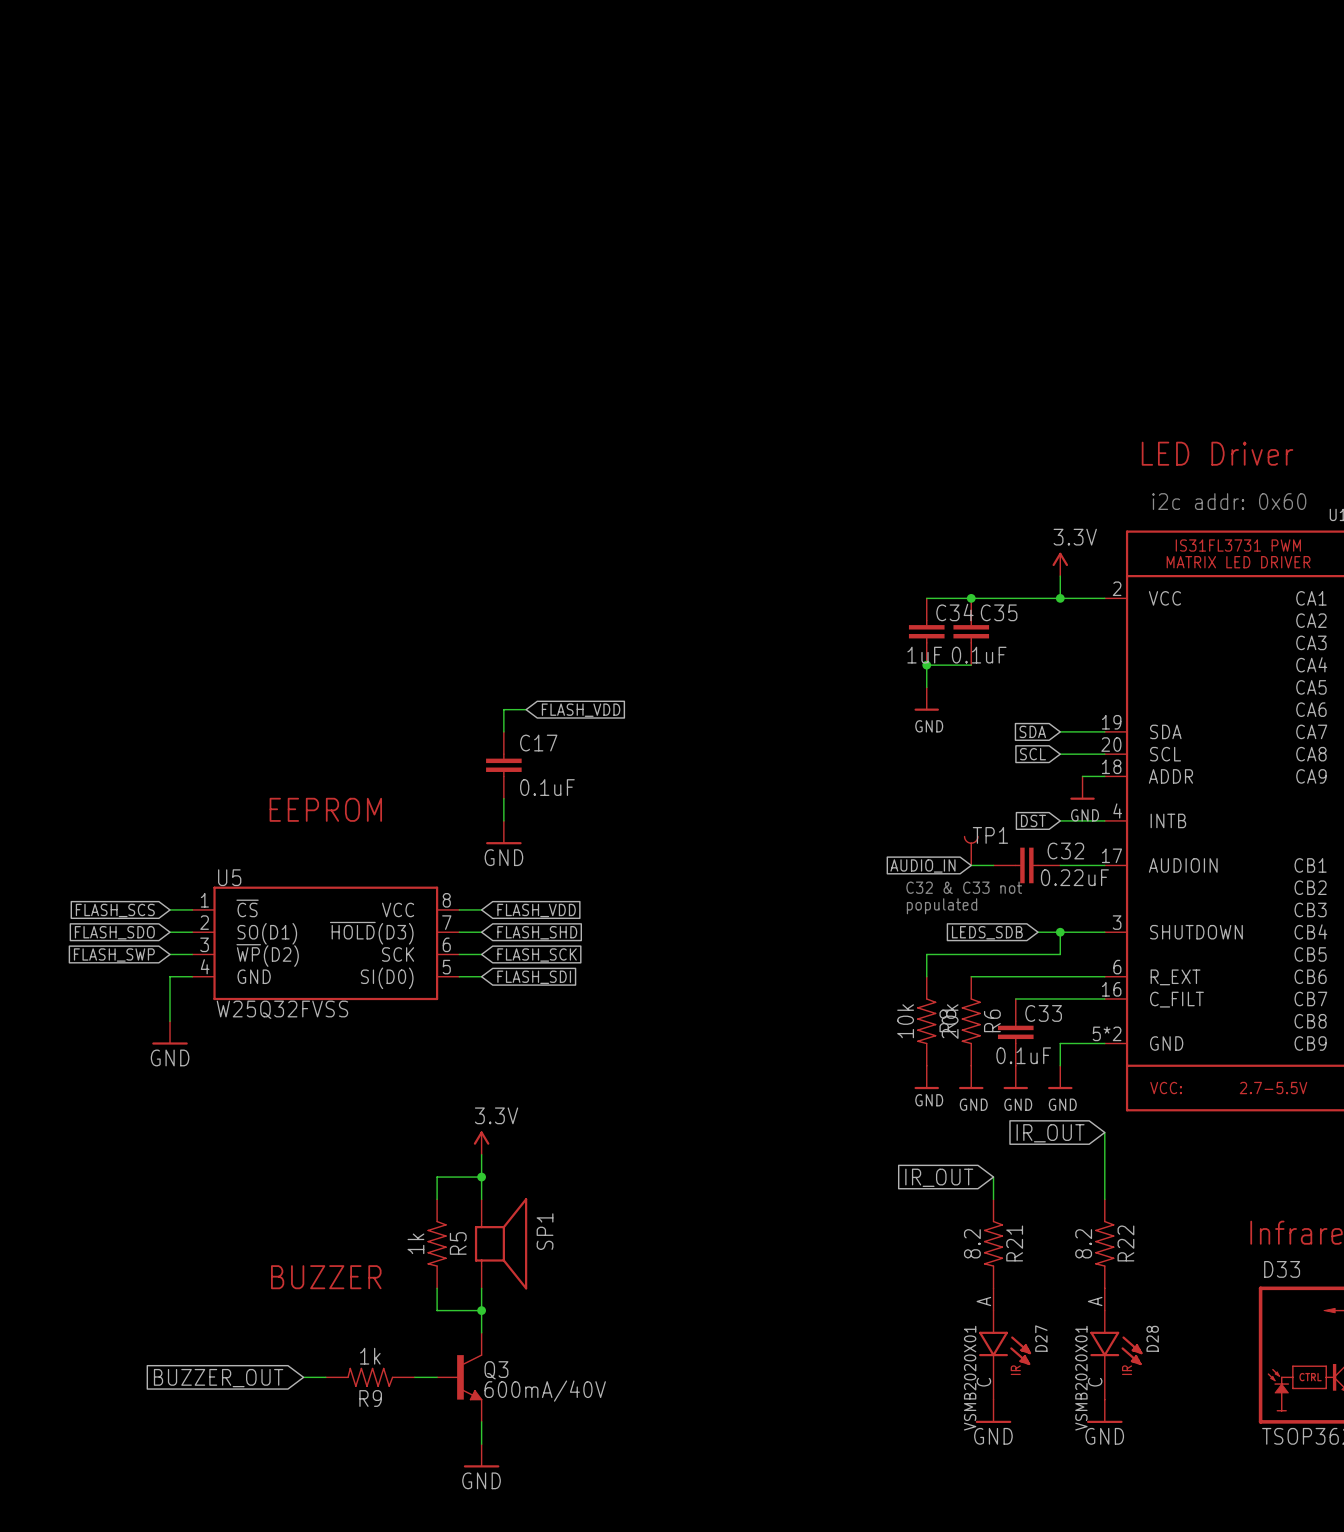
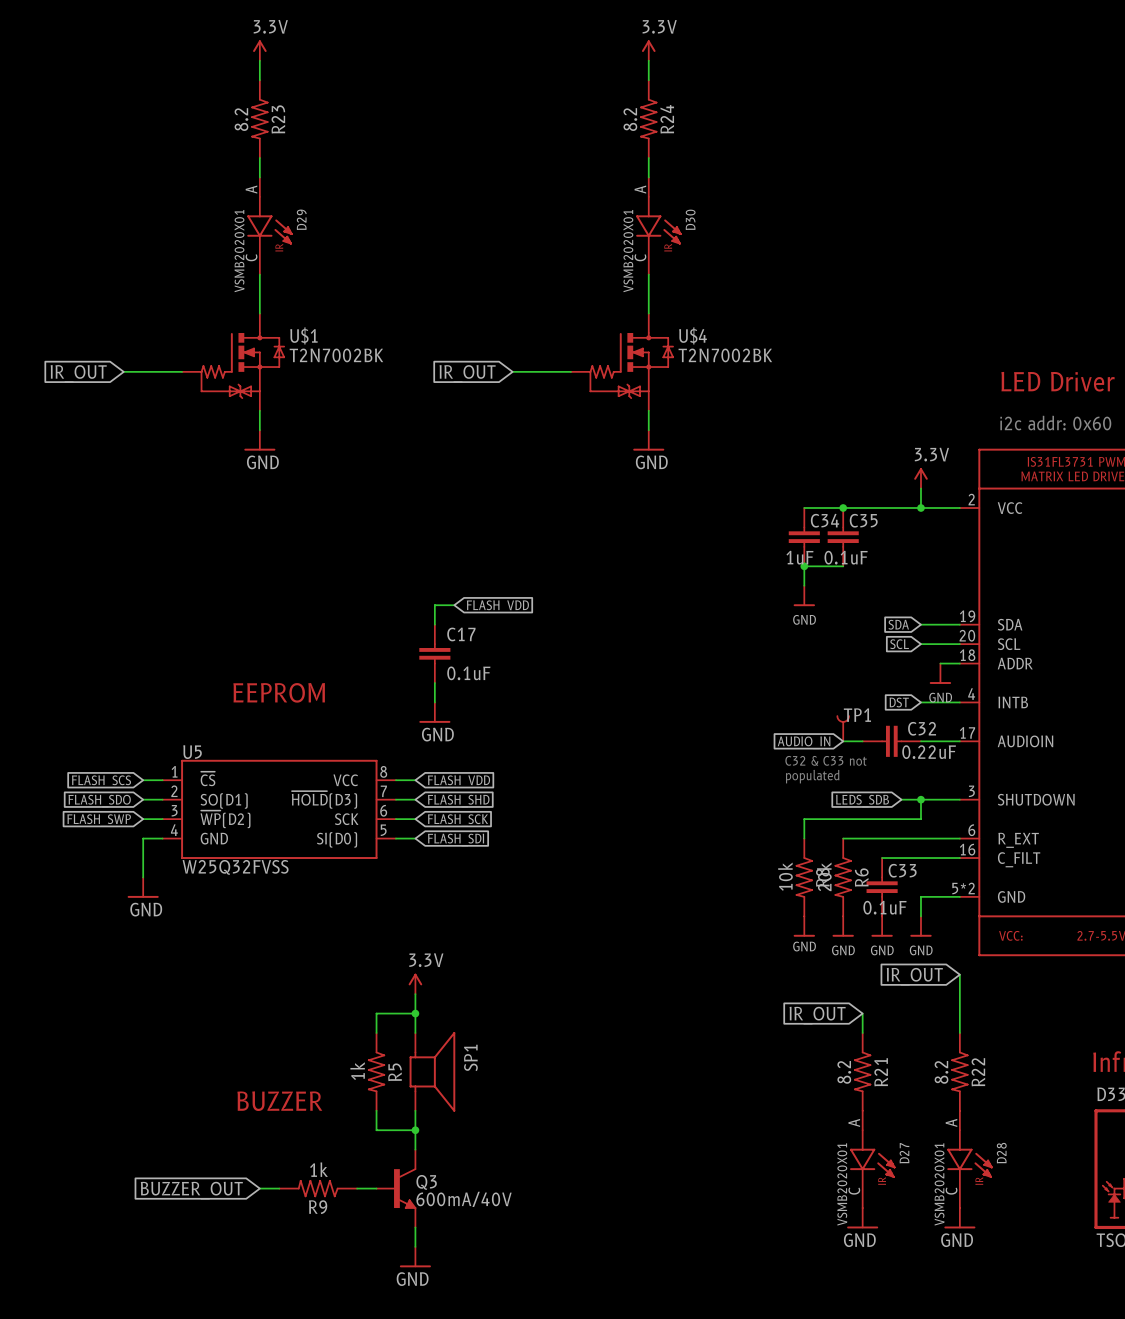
power symbol: none -> 3.3V (259, 50)
power symbol: none -> 3.3V (648, 50)
wire: none -> (259, 60) (259, 80)
wire: none -> (648, 60) (648, 80)
R23: none -> 8.2 (259, 119)
R24: none -> 8.2 (648, 119)
wire: none -> (259, 157) (259, 177)
wire: none -> (648, 157) (648, 177)
D29: none -> VSMB2020X01 (269, 226)
D30: none -> VSMB2020X01 (658, 226)
wire: none -> (259, 274) (259, 313)
wire: none -> (648, 274) (648, 313)
U$1: none -> T2N7002BK (233, 362)
U$4: none -> T2N7002BK (622, 362)
wire: none -> (123, 371) (182, 371)
wire: none -> (512, 371) (570, 371)
global label: none -> IR_OUT (78, 373)
global label: none -> IR_OUT (467, 373)
wire: none -> (259, 410) (259, 430)
wire: none -> (648, 410) (648, 430)
power symbol: none -> GND (259, 440)
power symbol: none -> GND (648, 440)

